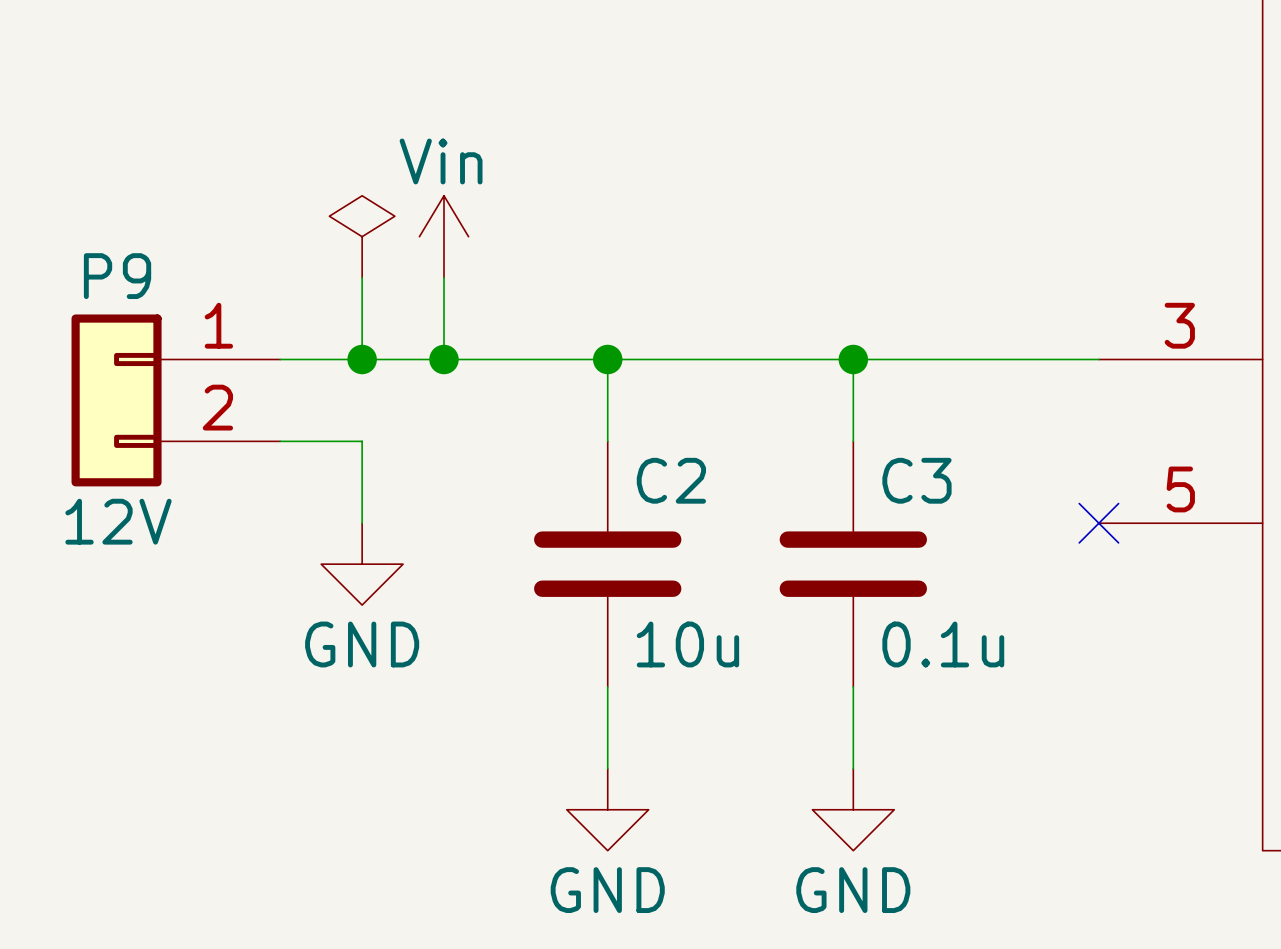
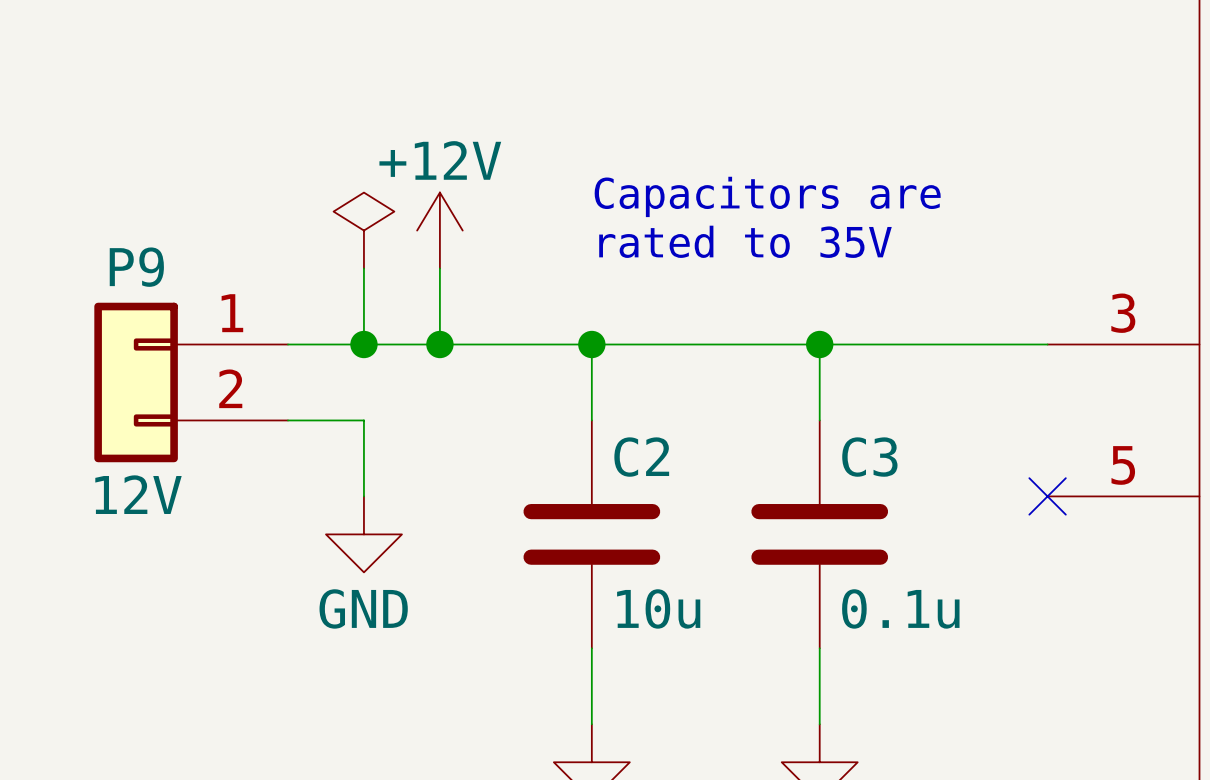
text: none -> Capacitors are (767, 196)
power symbol: Vin (444, 236) -> +12V (439, 230)
text: none -> rated to 35V (745, 241)

